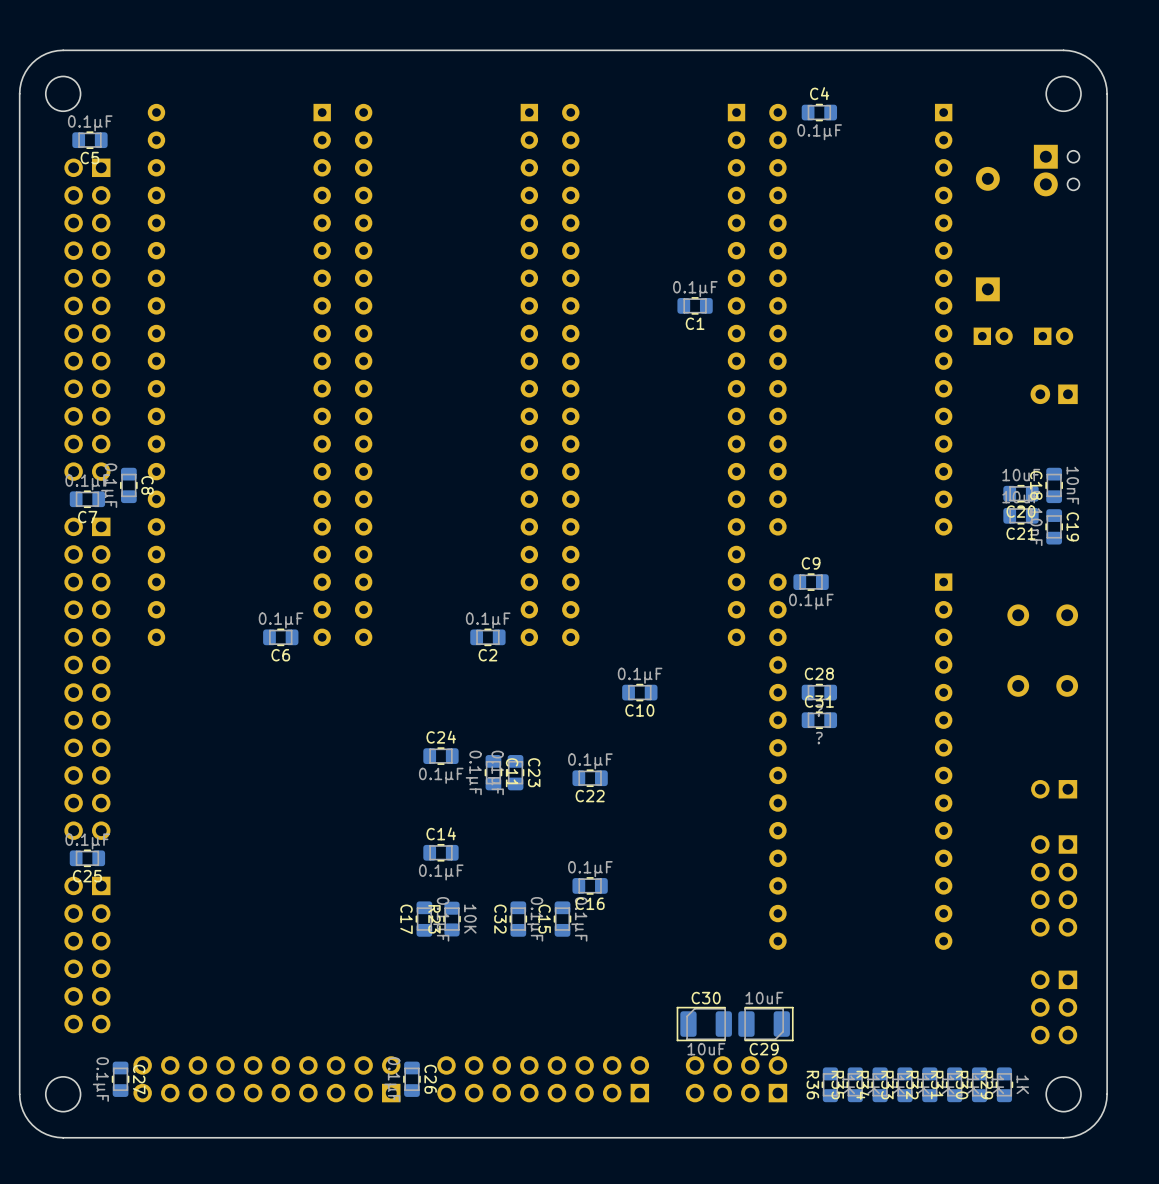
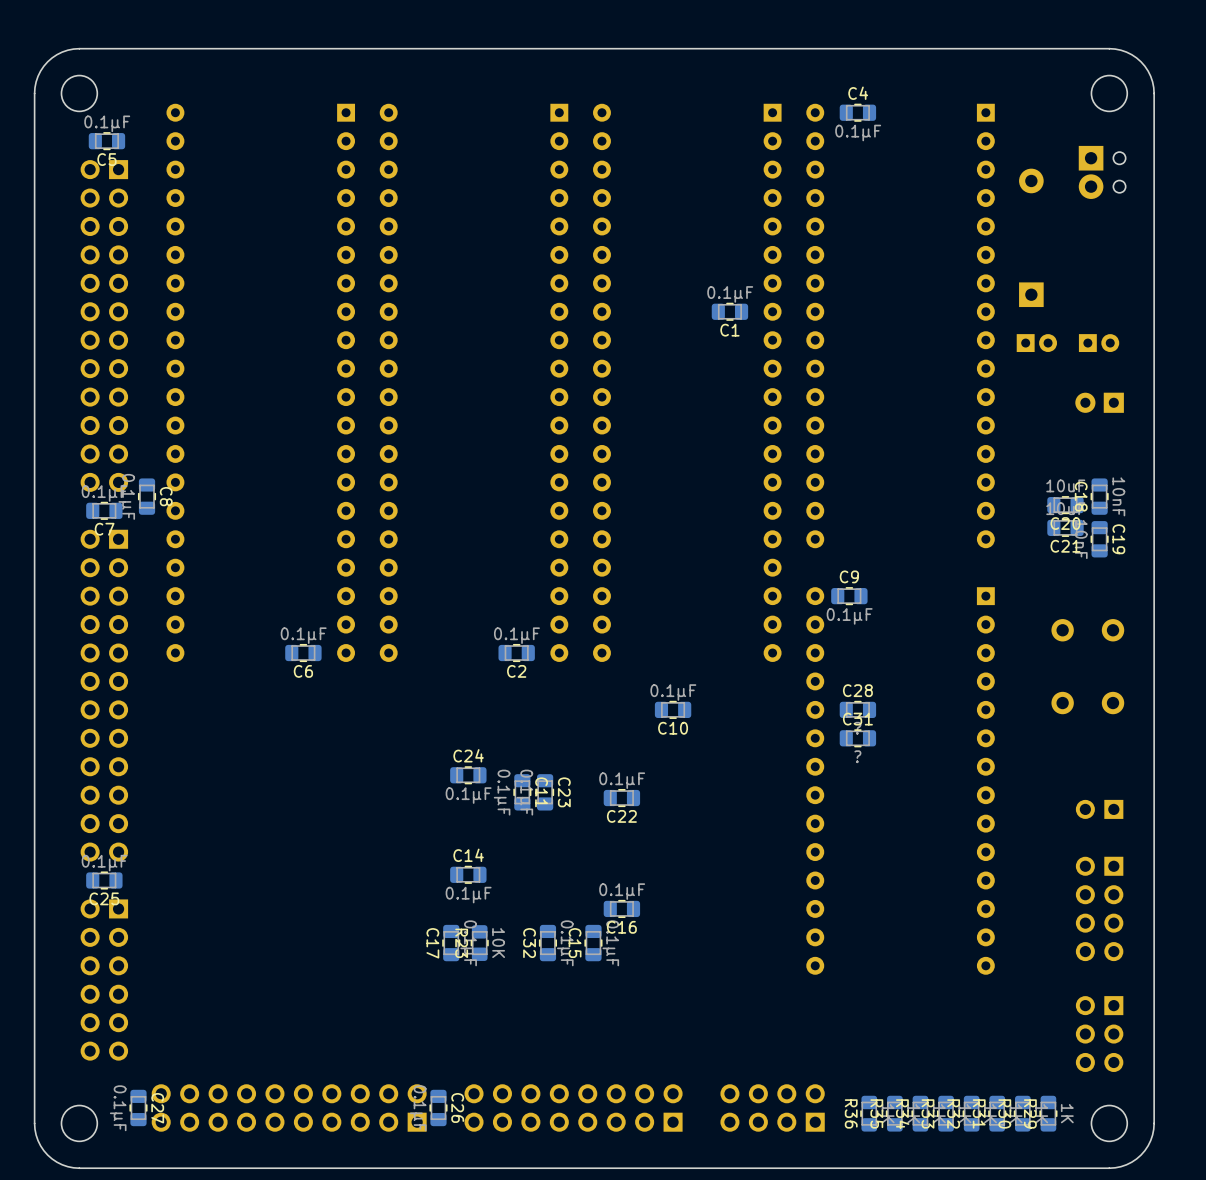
C30: 10uF (704, 1024) -> none
C29: 10uF (765, 1024) -> none

